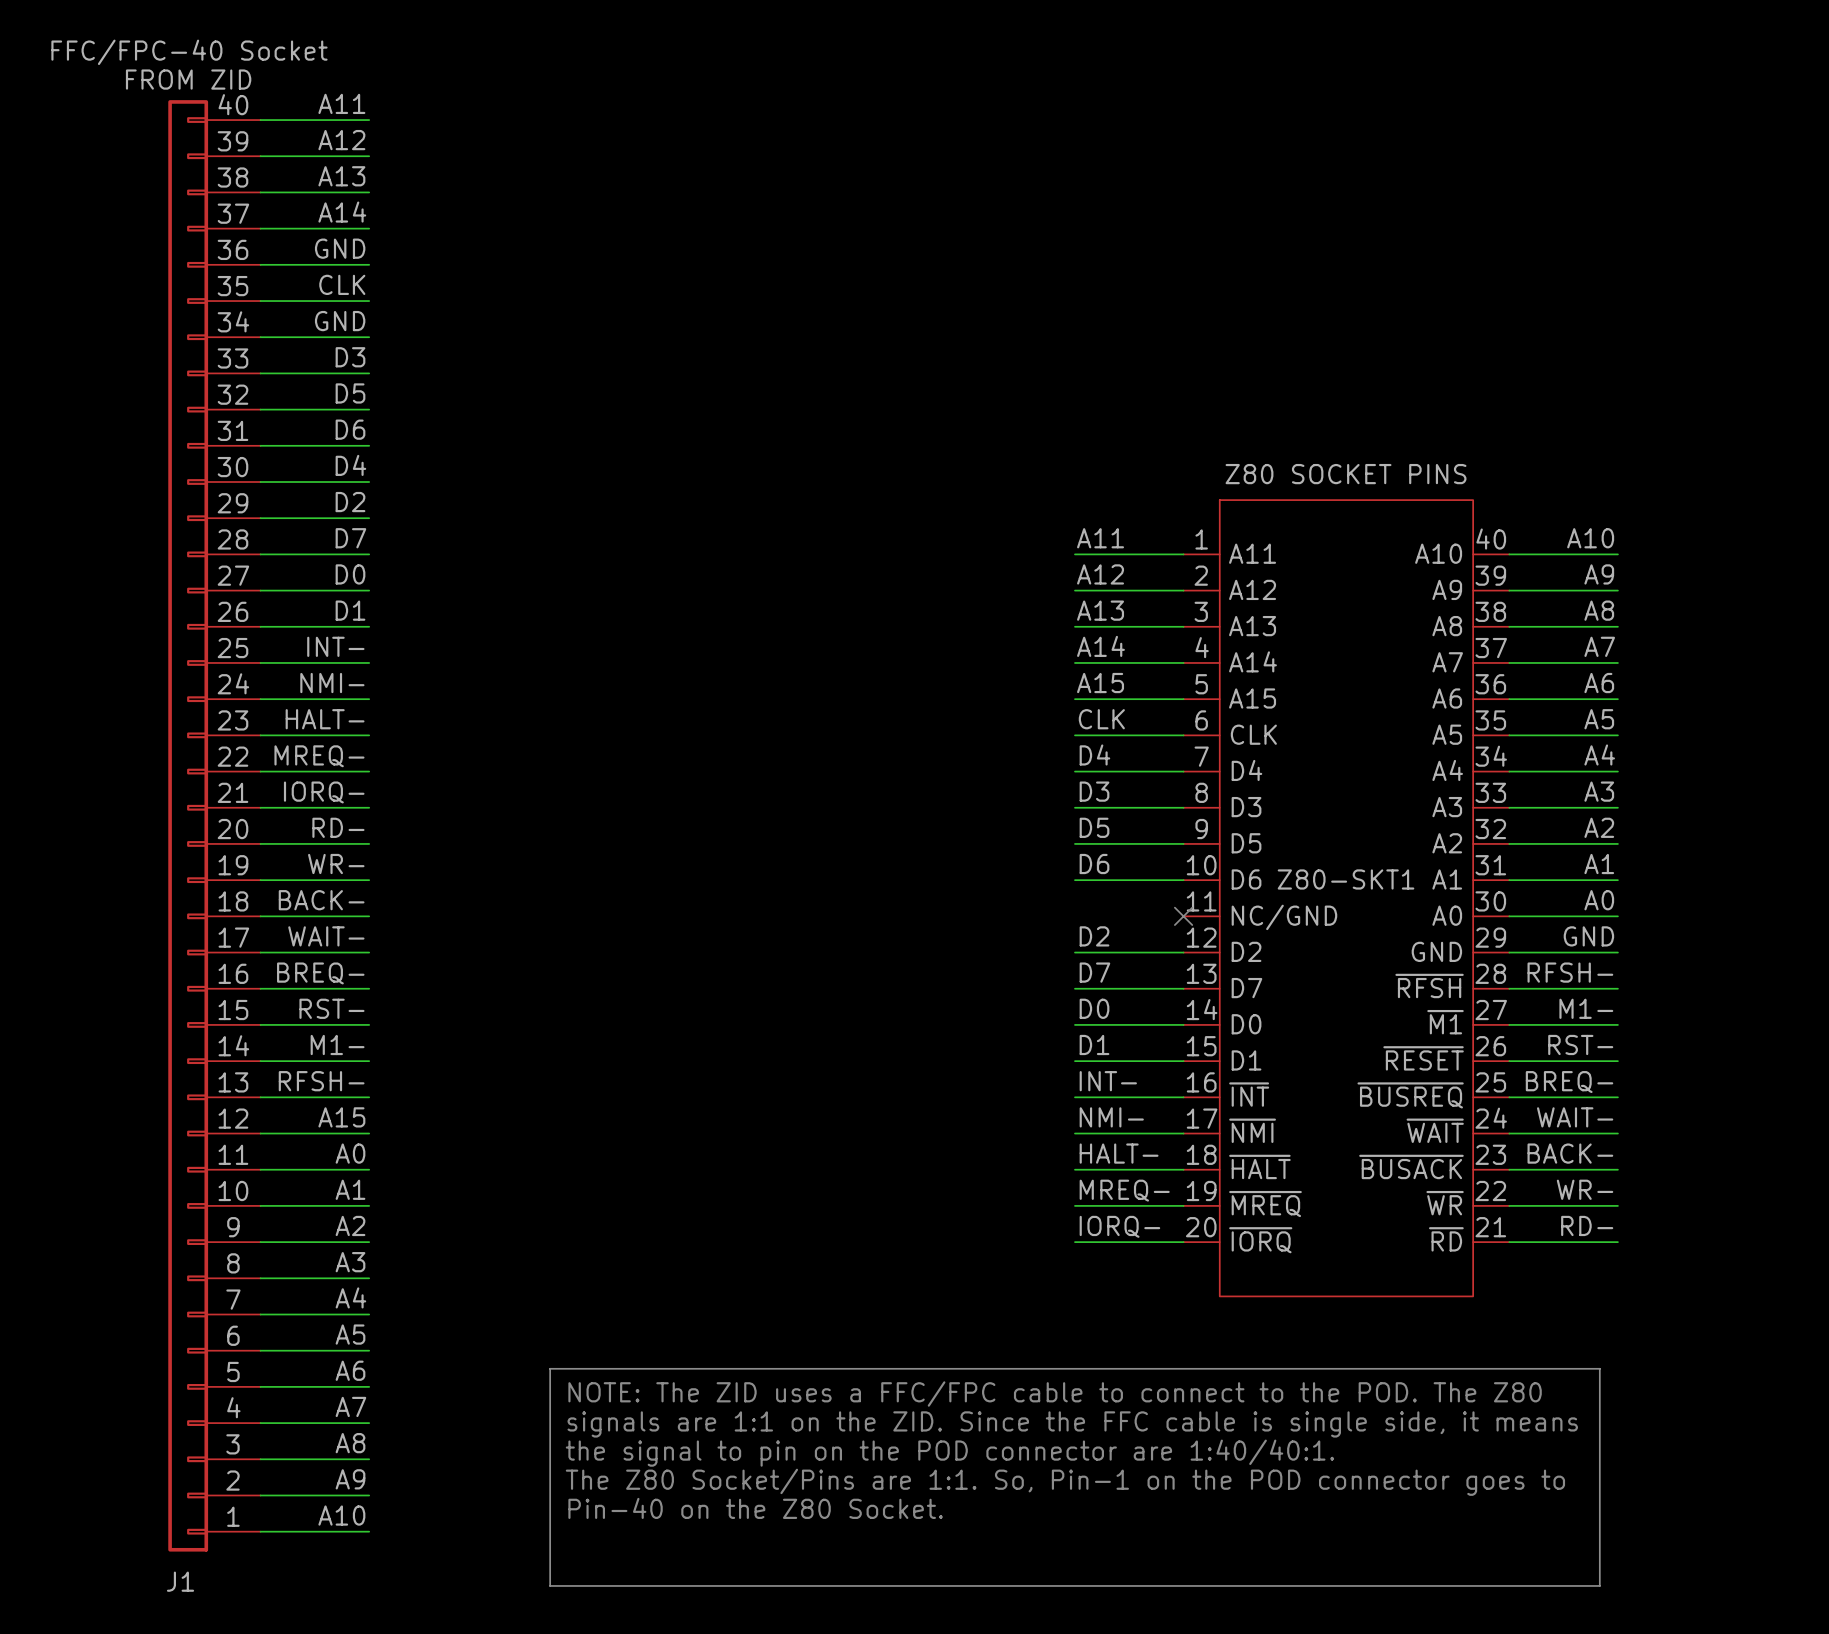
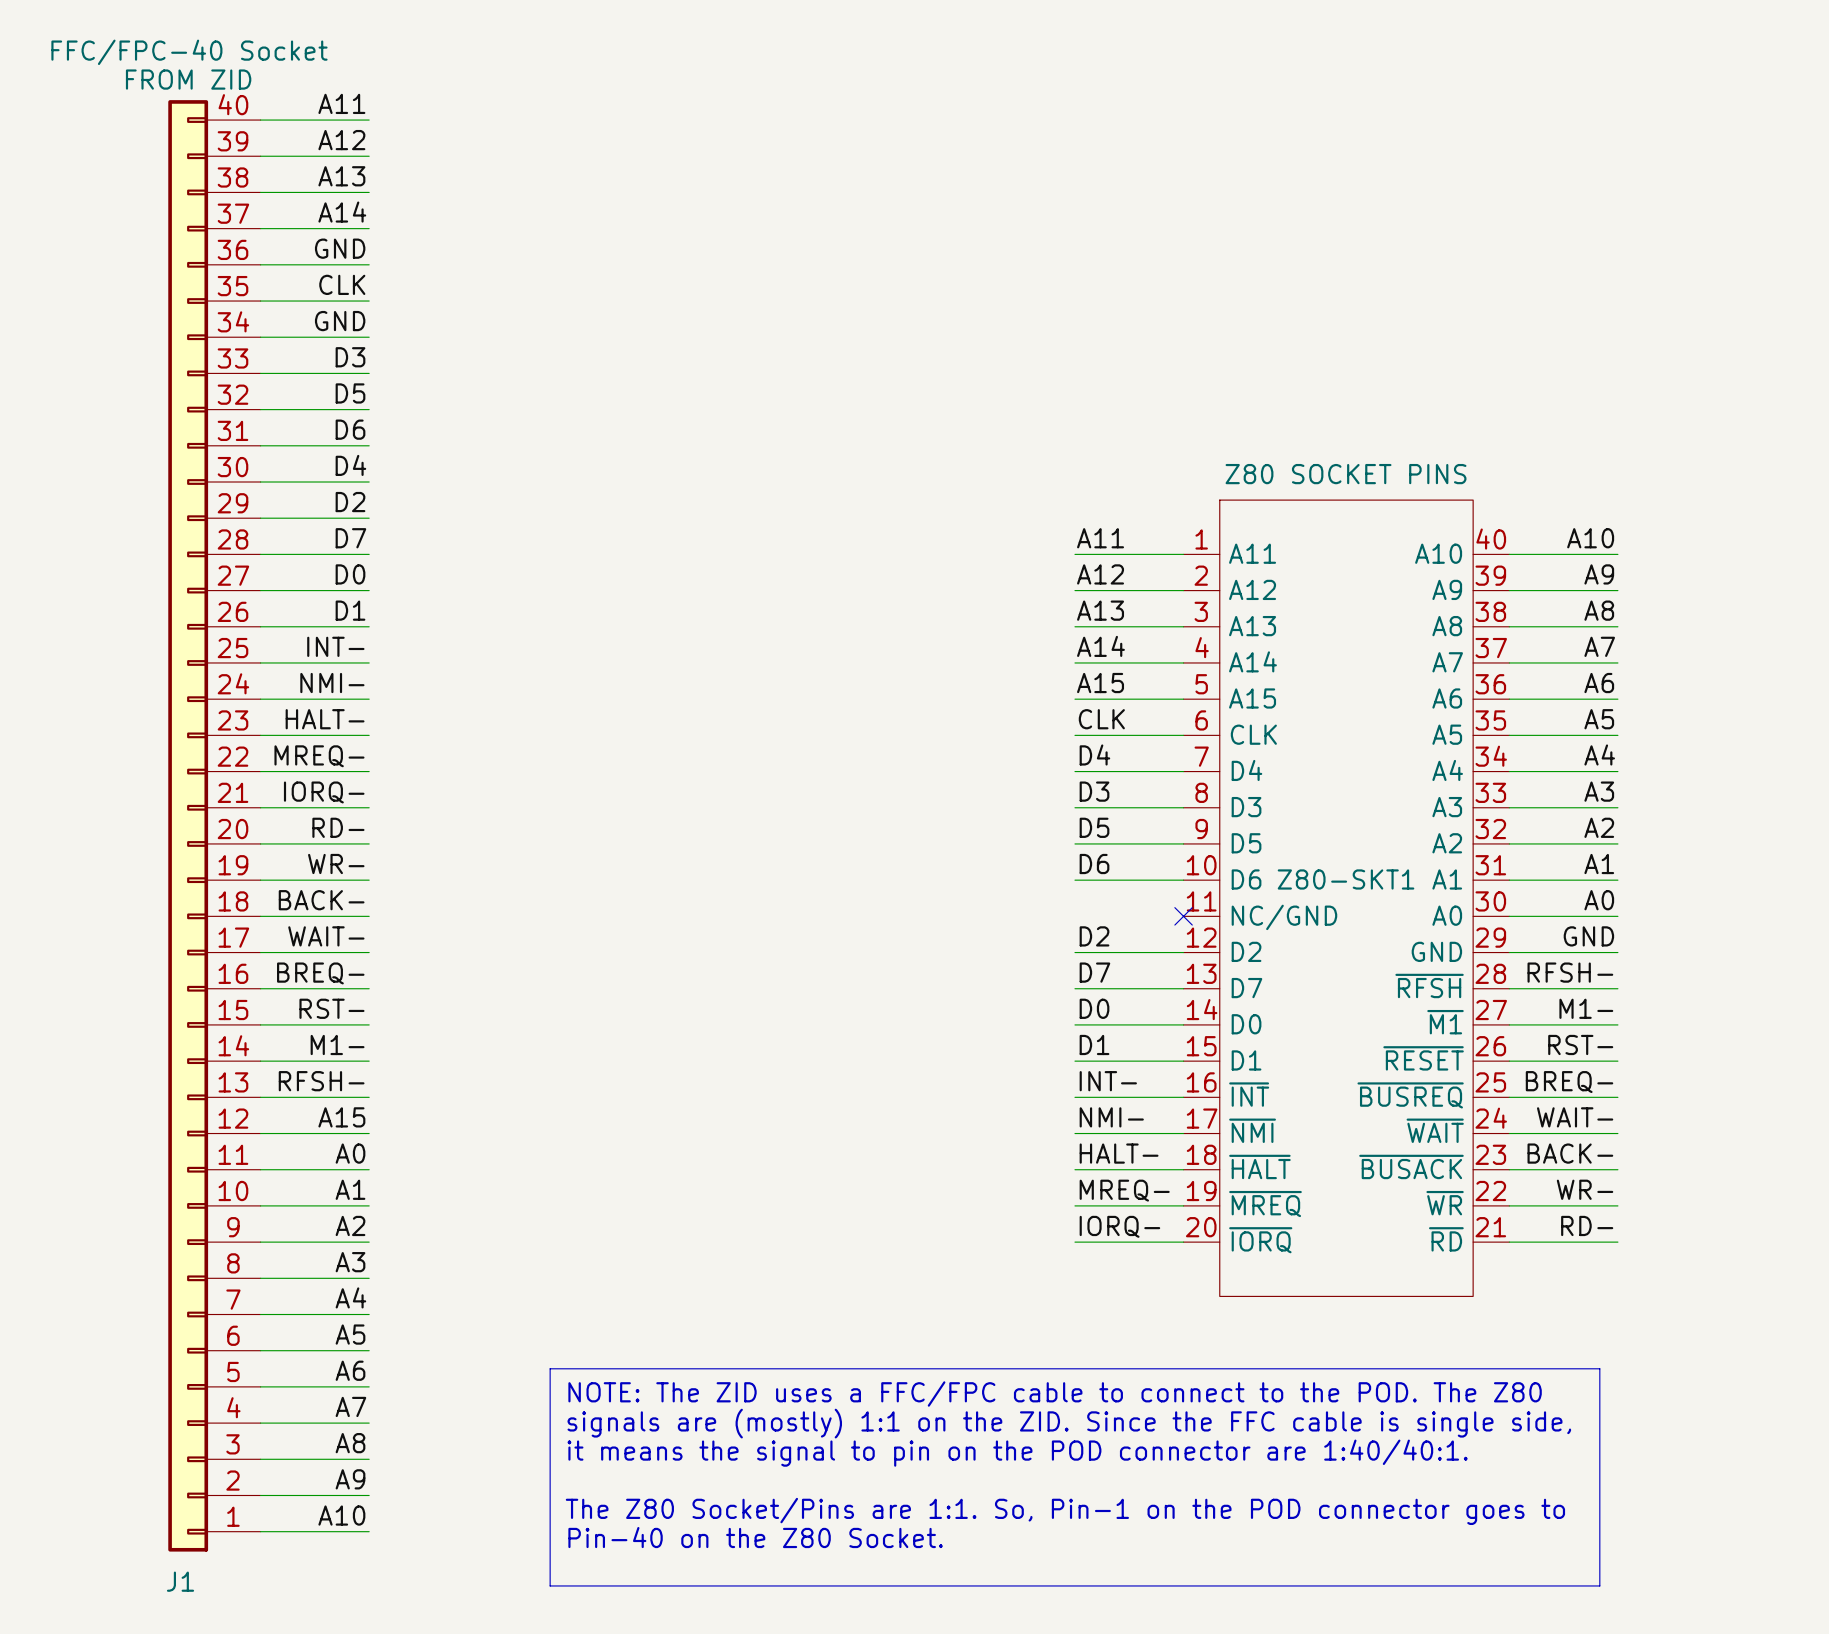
text: signals are 1:1 on the ZID. Since the FFC cable is single side, it means (1072, 1424) -> signals are (mostly) 1:1 on the ZID. Since the FFC cable is single side, (1069, 1423)
text: the signal to pin on the POD connector are 1:40/40:1. (949, 1453) -> it means the signal to pin on the POD connector are 1:40/40:1. (1017, 1453)
text: The Z80 Socket/Pins are 1:1. So, Pin-1 on the POD connector goes to (1065, 1482) -> none
text: Pin-40 on the Z80 Socket. (755, 1508) -> The Z80 Socket/Pins are 1:1. So, Pin-1 on the POD connector goes to (1065, 1511)
text: none -> Pin-40 on the Z80 Socket. (755, 1537)

